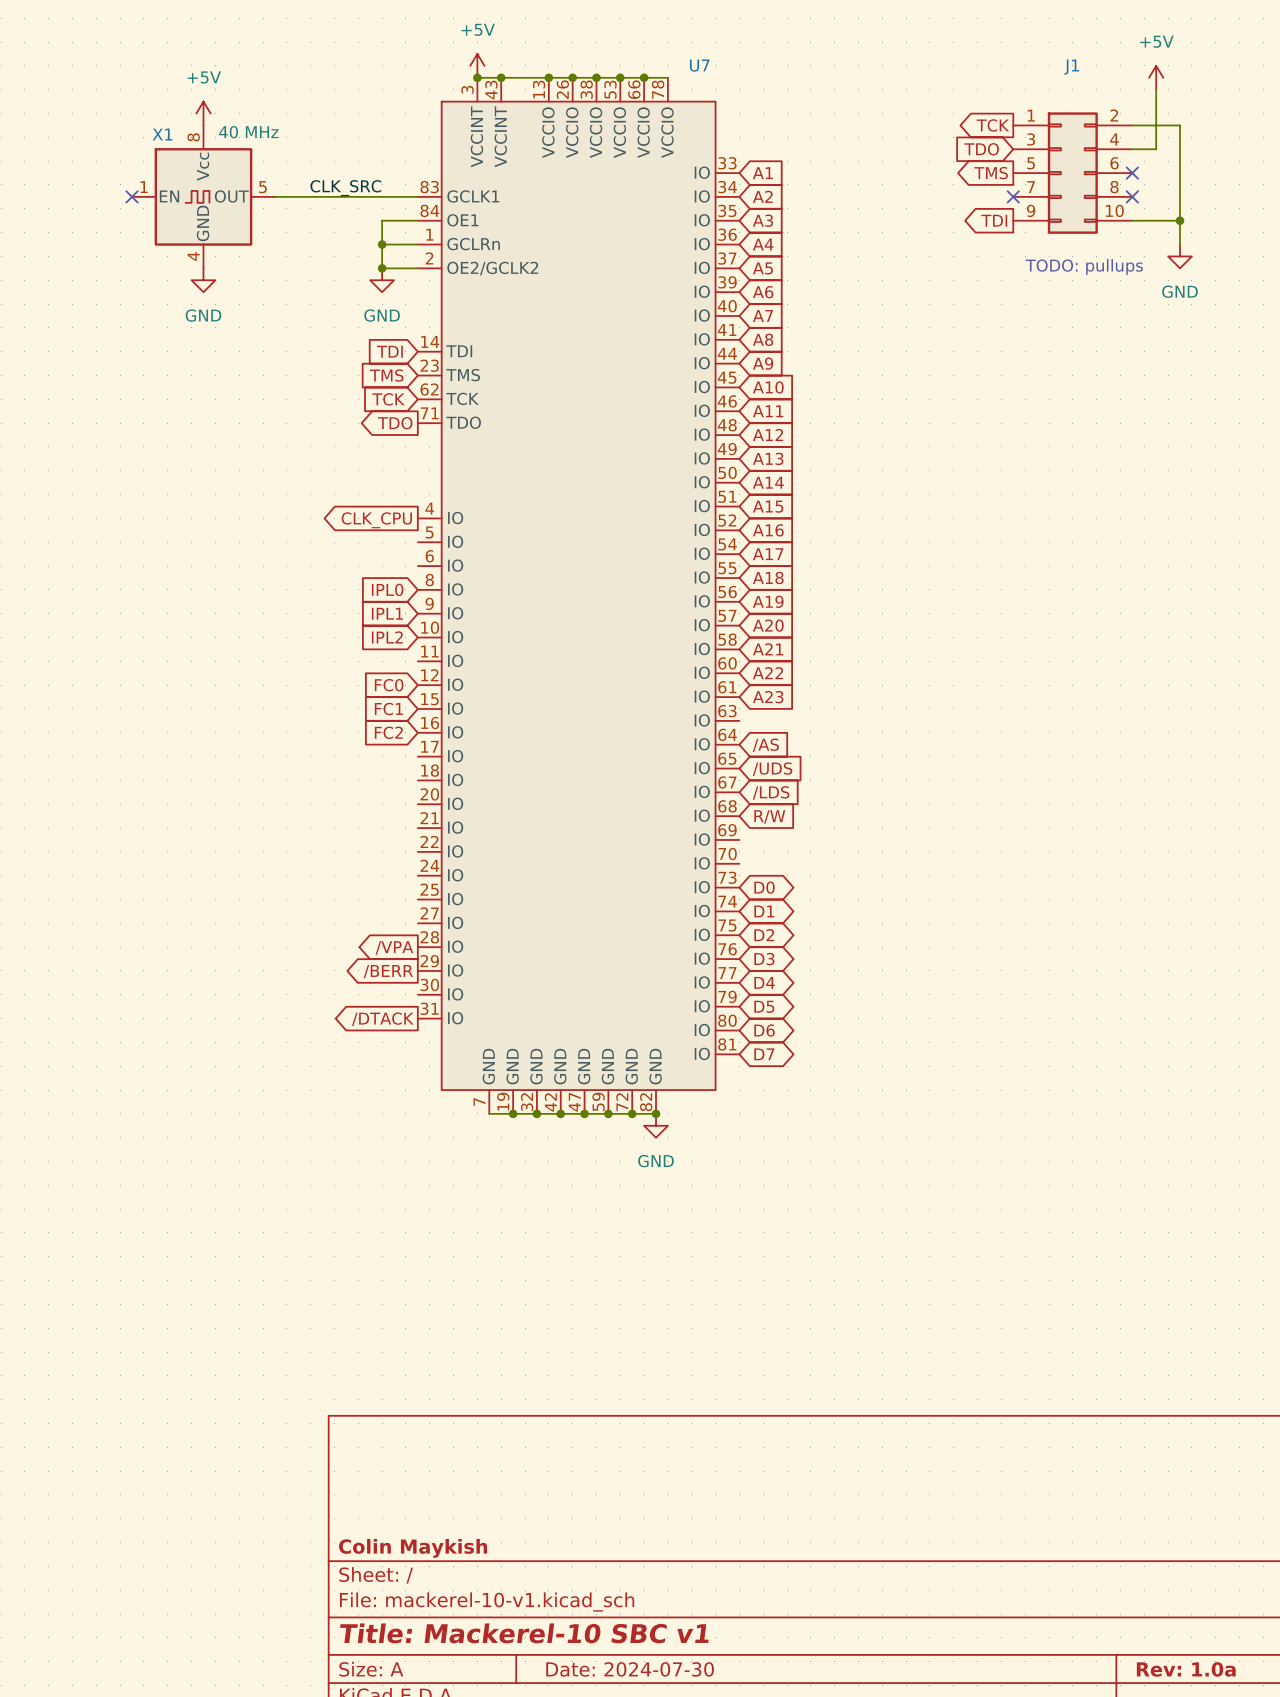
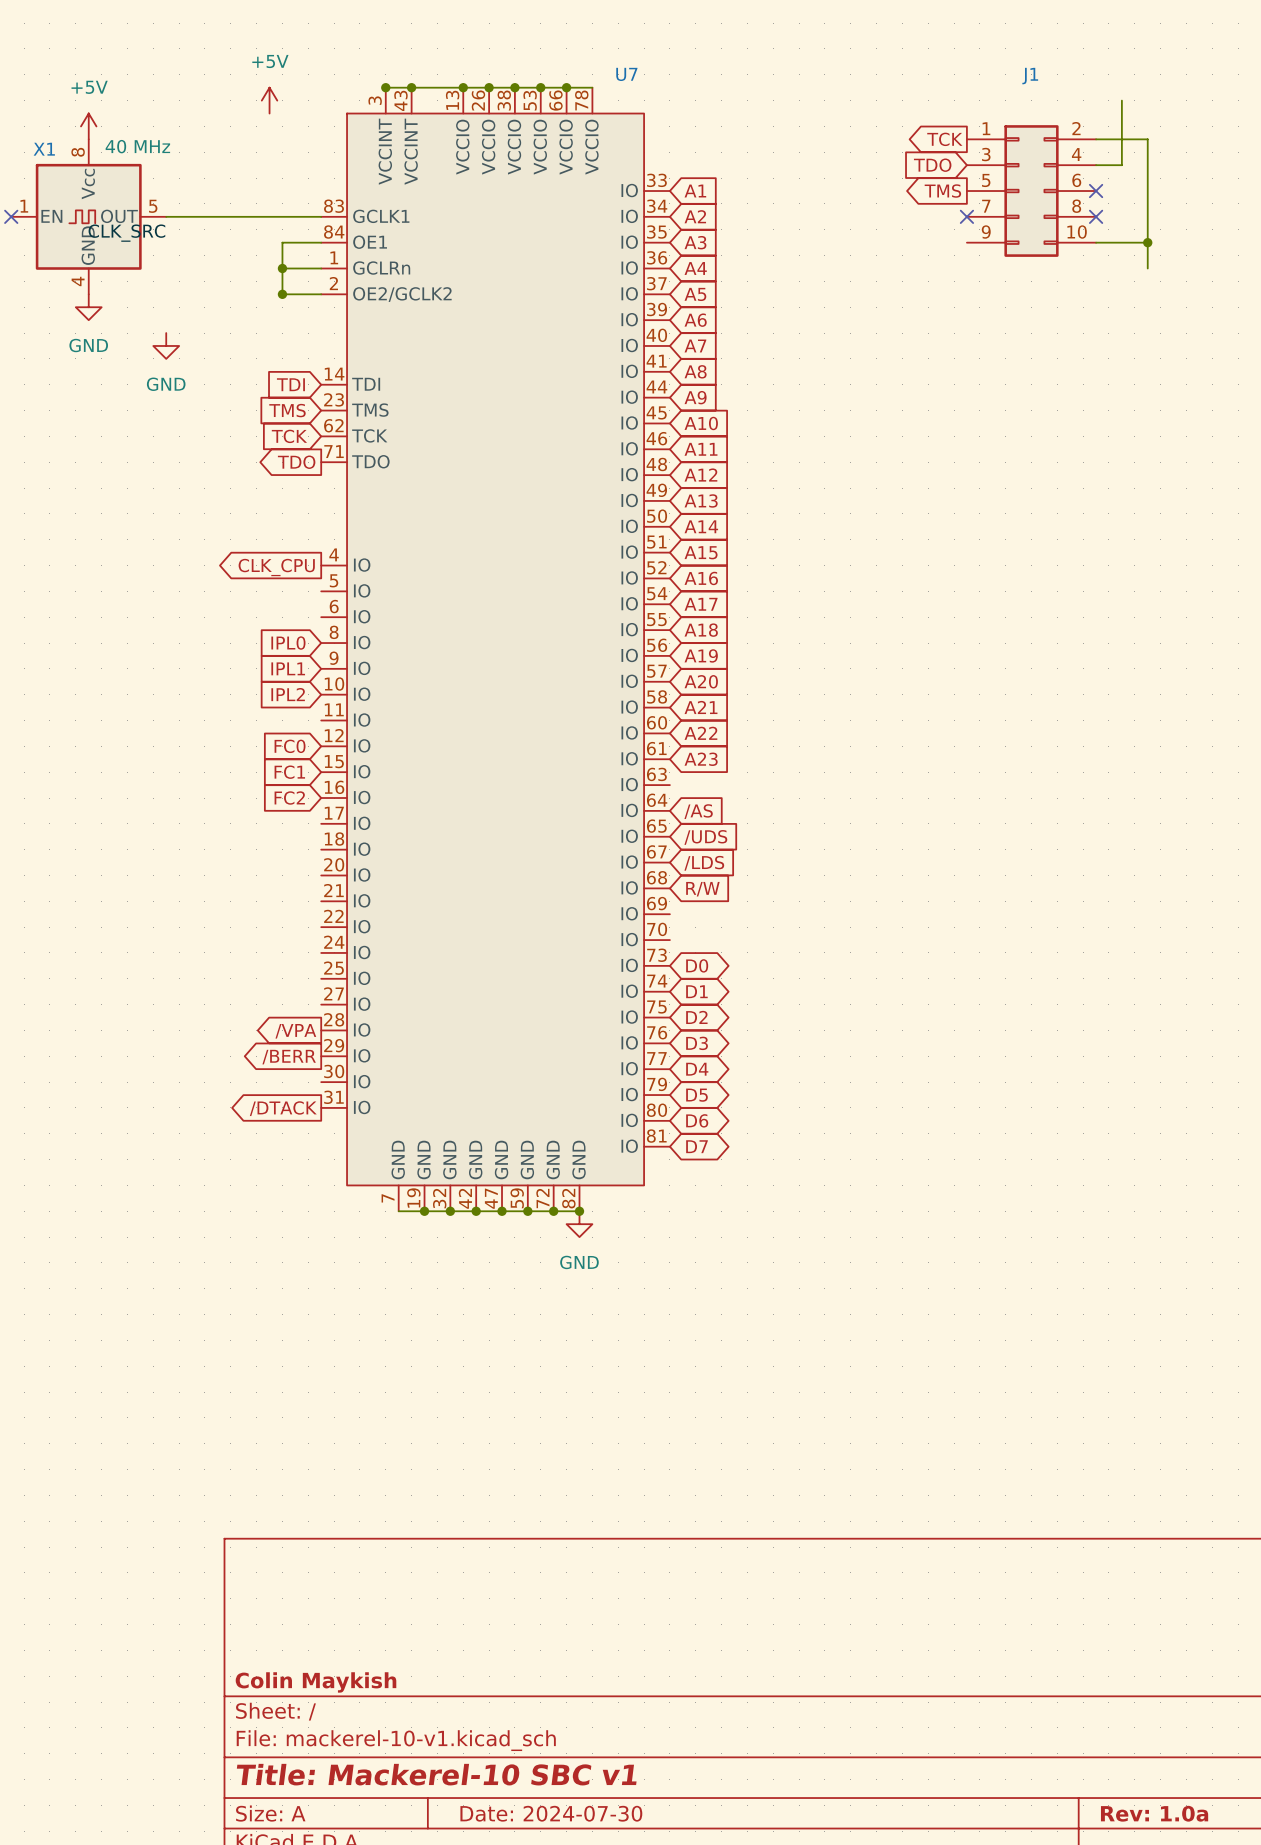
power symbol position: +5V (477, 65) -> +5V (269, 100)
power symbol: +5V (1156, 77) -> none
label position: CLK_SRC (345, 188) -> CLK_SRC (126, 233)
global label: TDI (994, 220) -> none
power symbol: GND (1180, 256) -> none
text: TODO: pullups (1084, 267) -> none
power symbol position: GND (382, 280) -> GND (166, 345)

